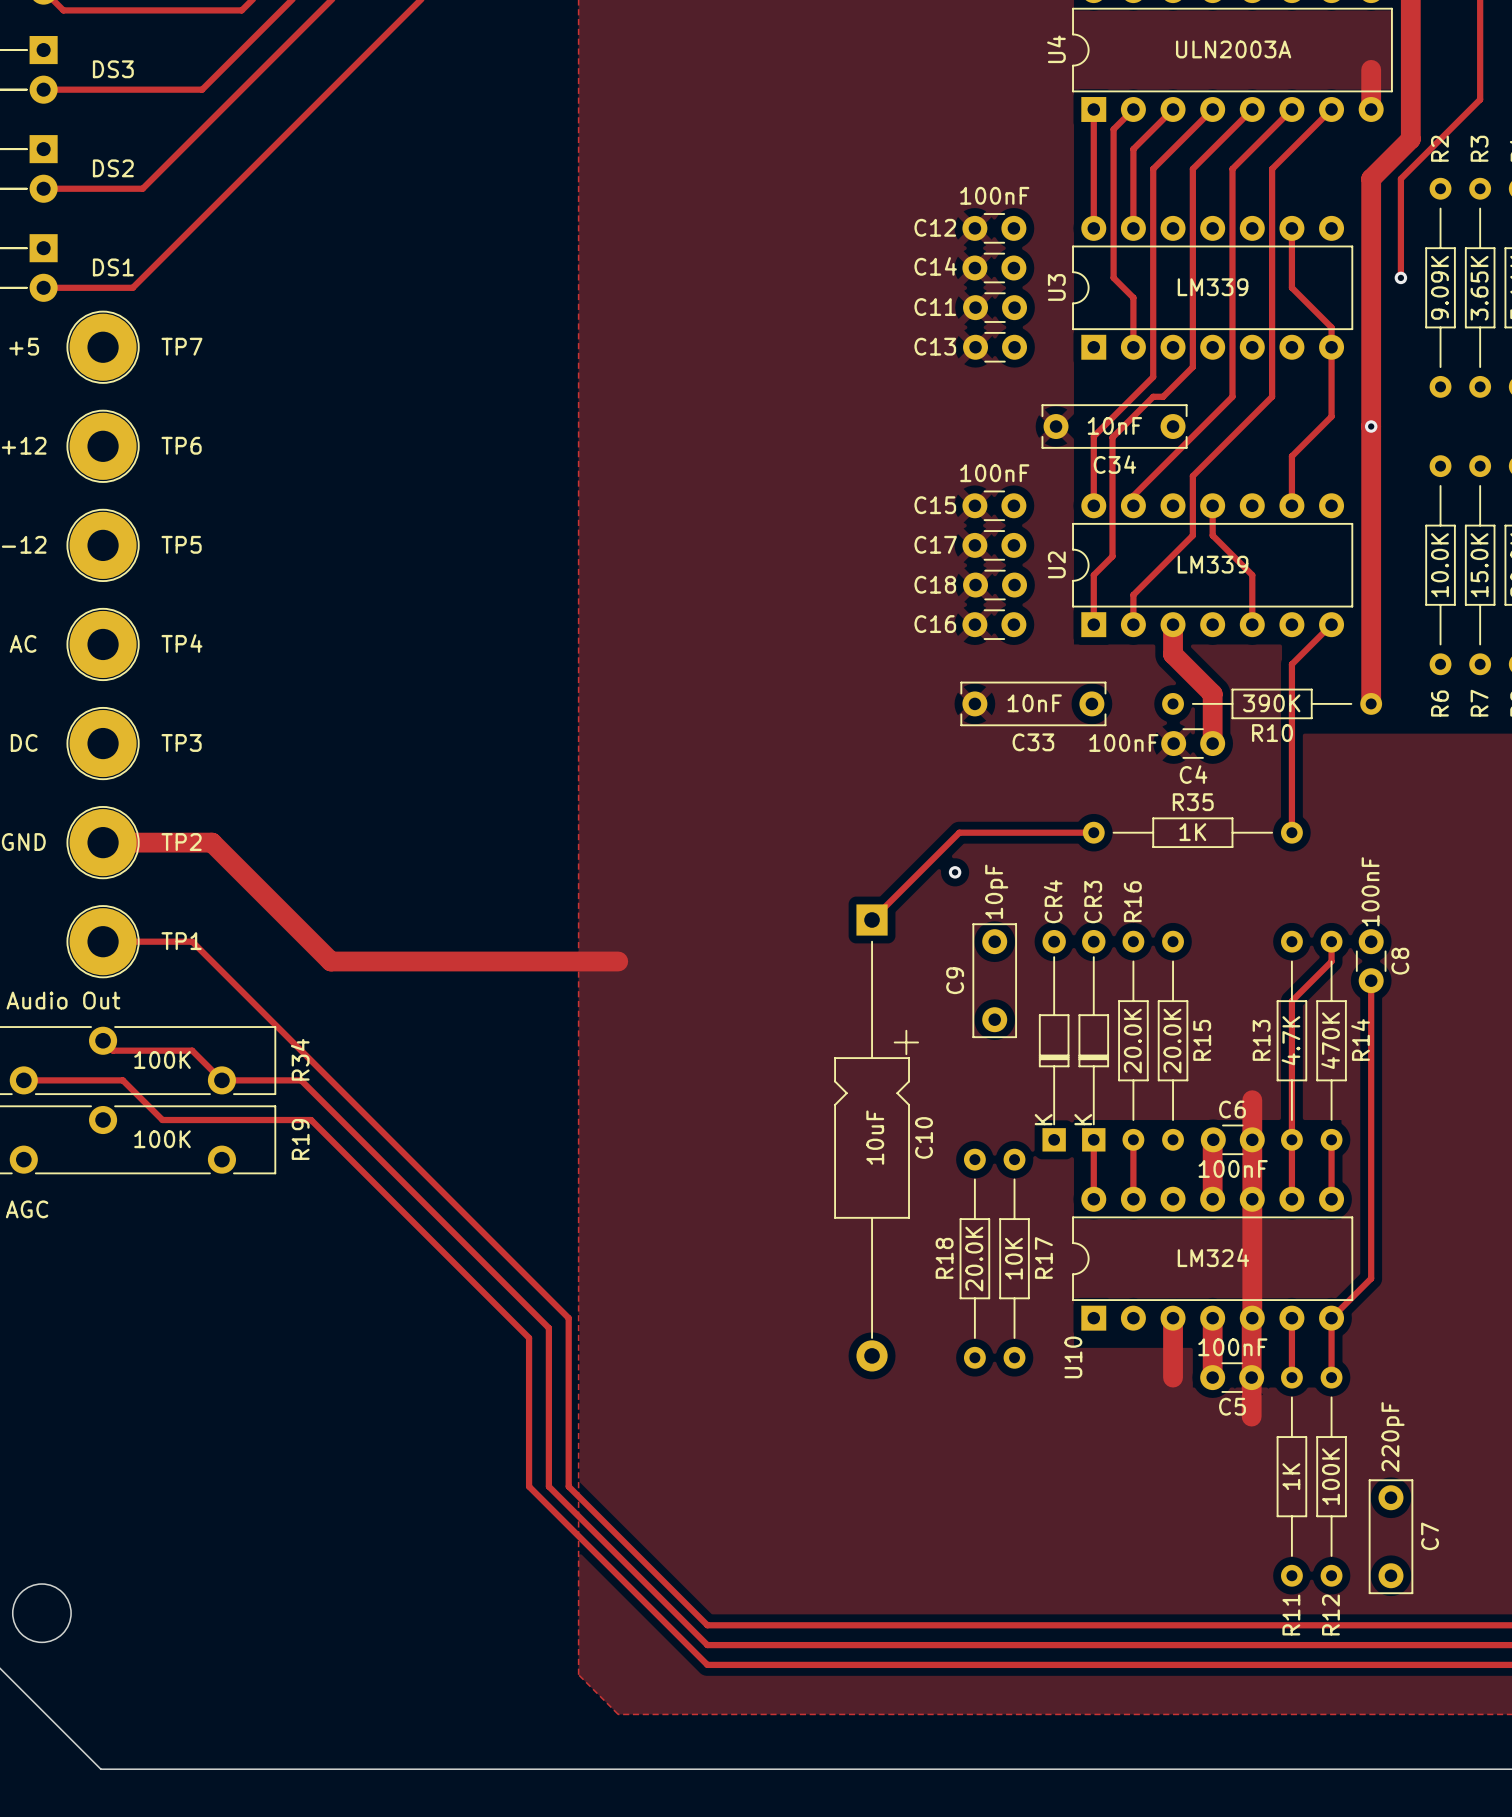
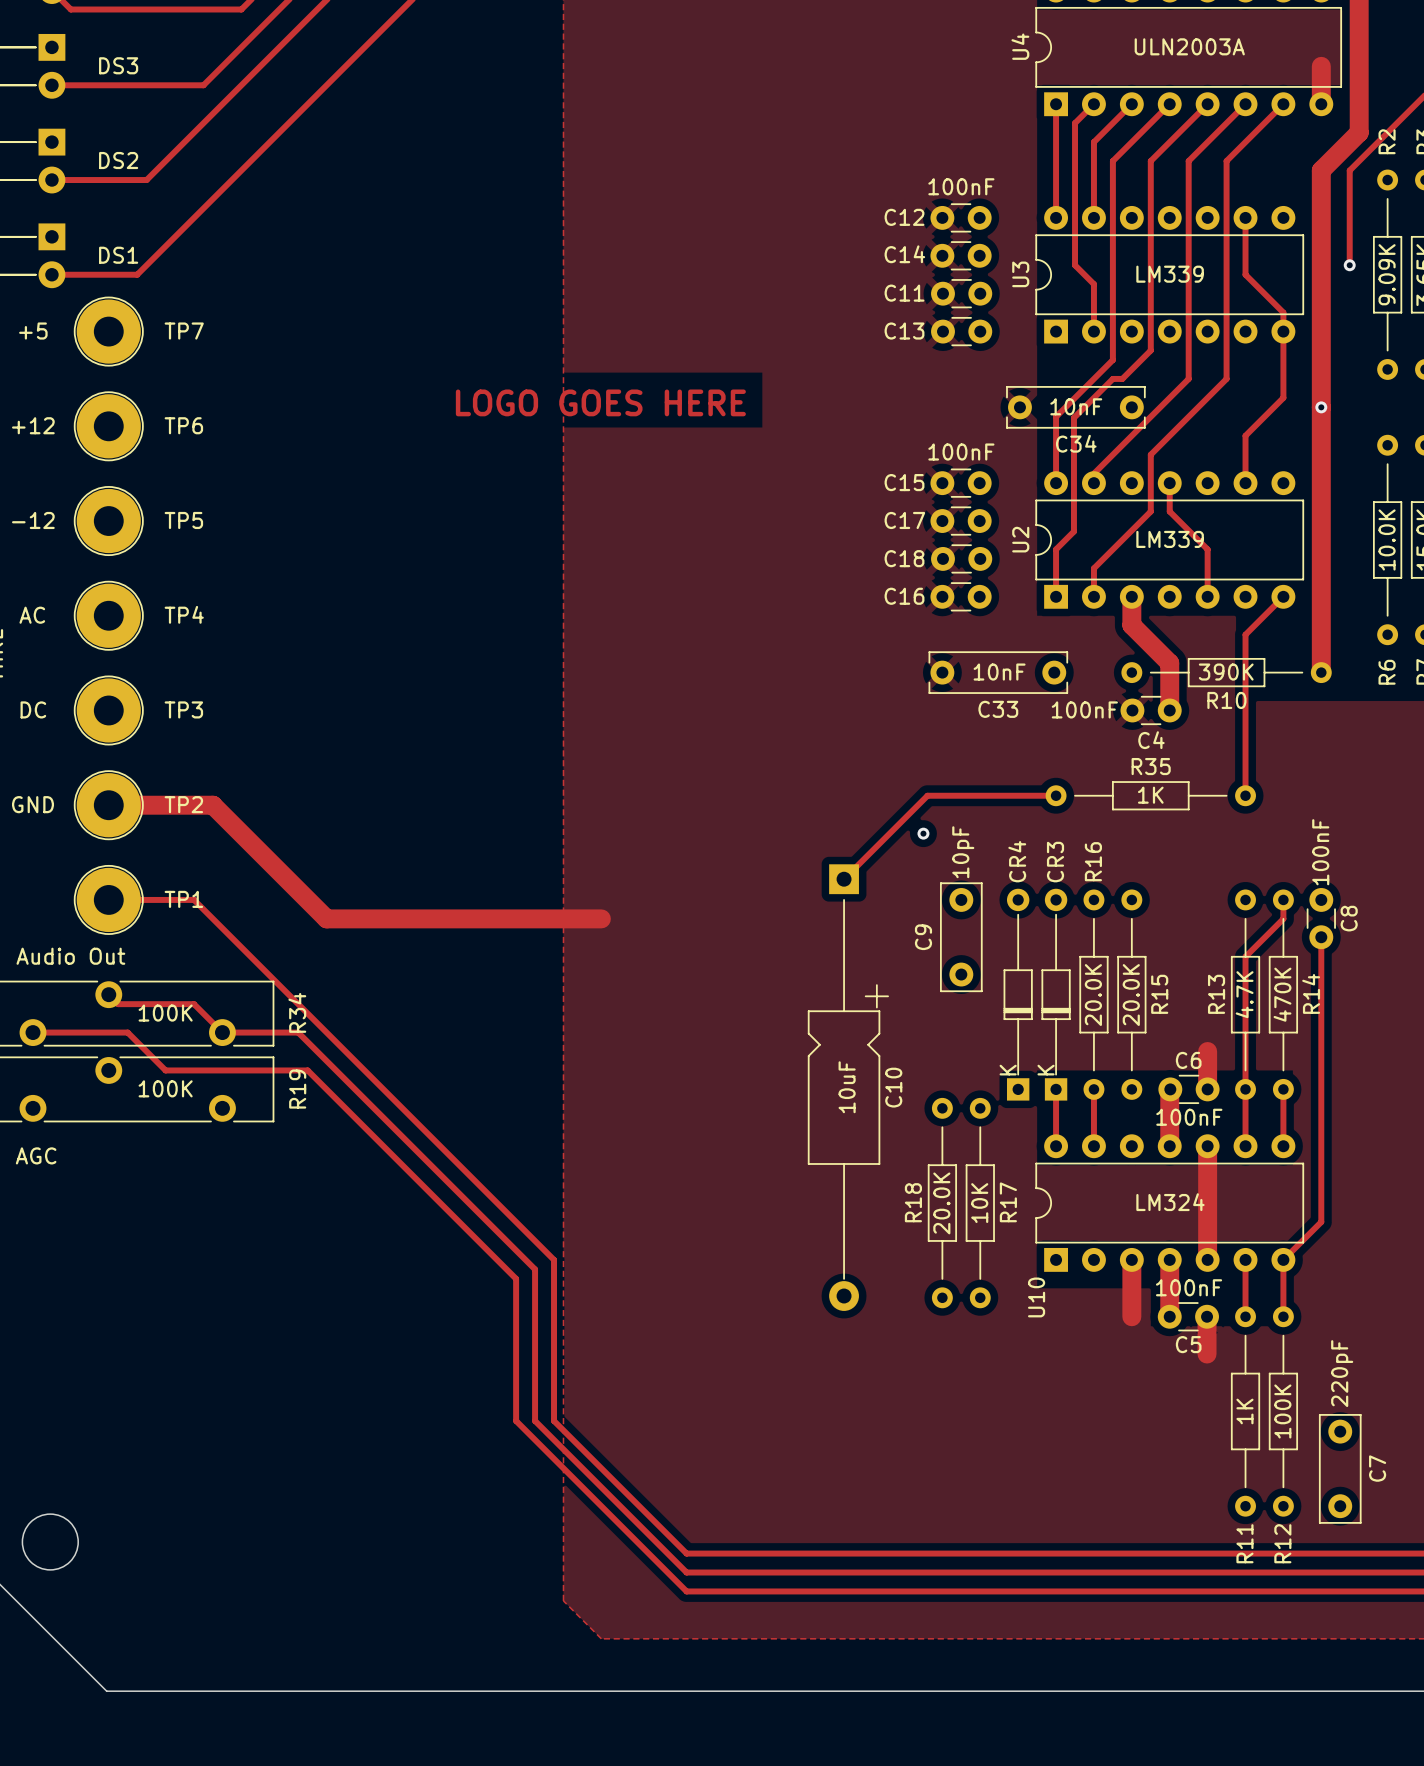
text: none -> LOGO GOES HERE (600, 402)
track: (1252, 1139) (1252, 1199) -> none
track: (1252, 1318) (1251, 1377) -> none

